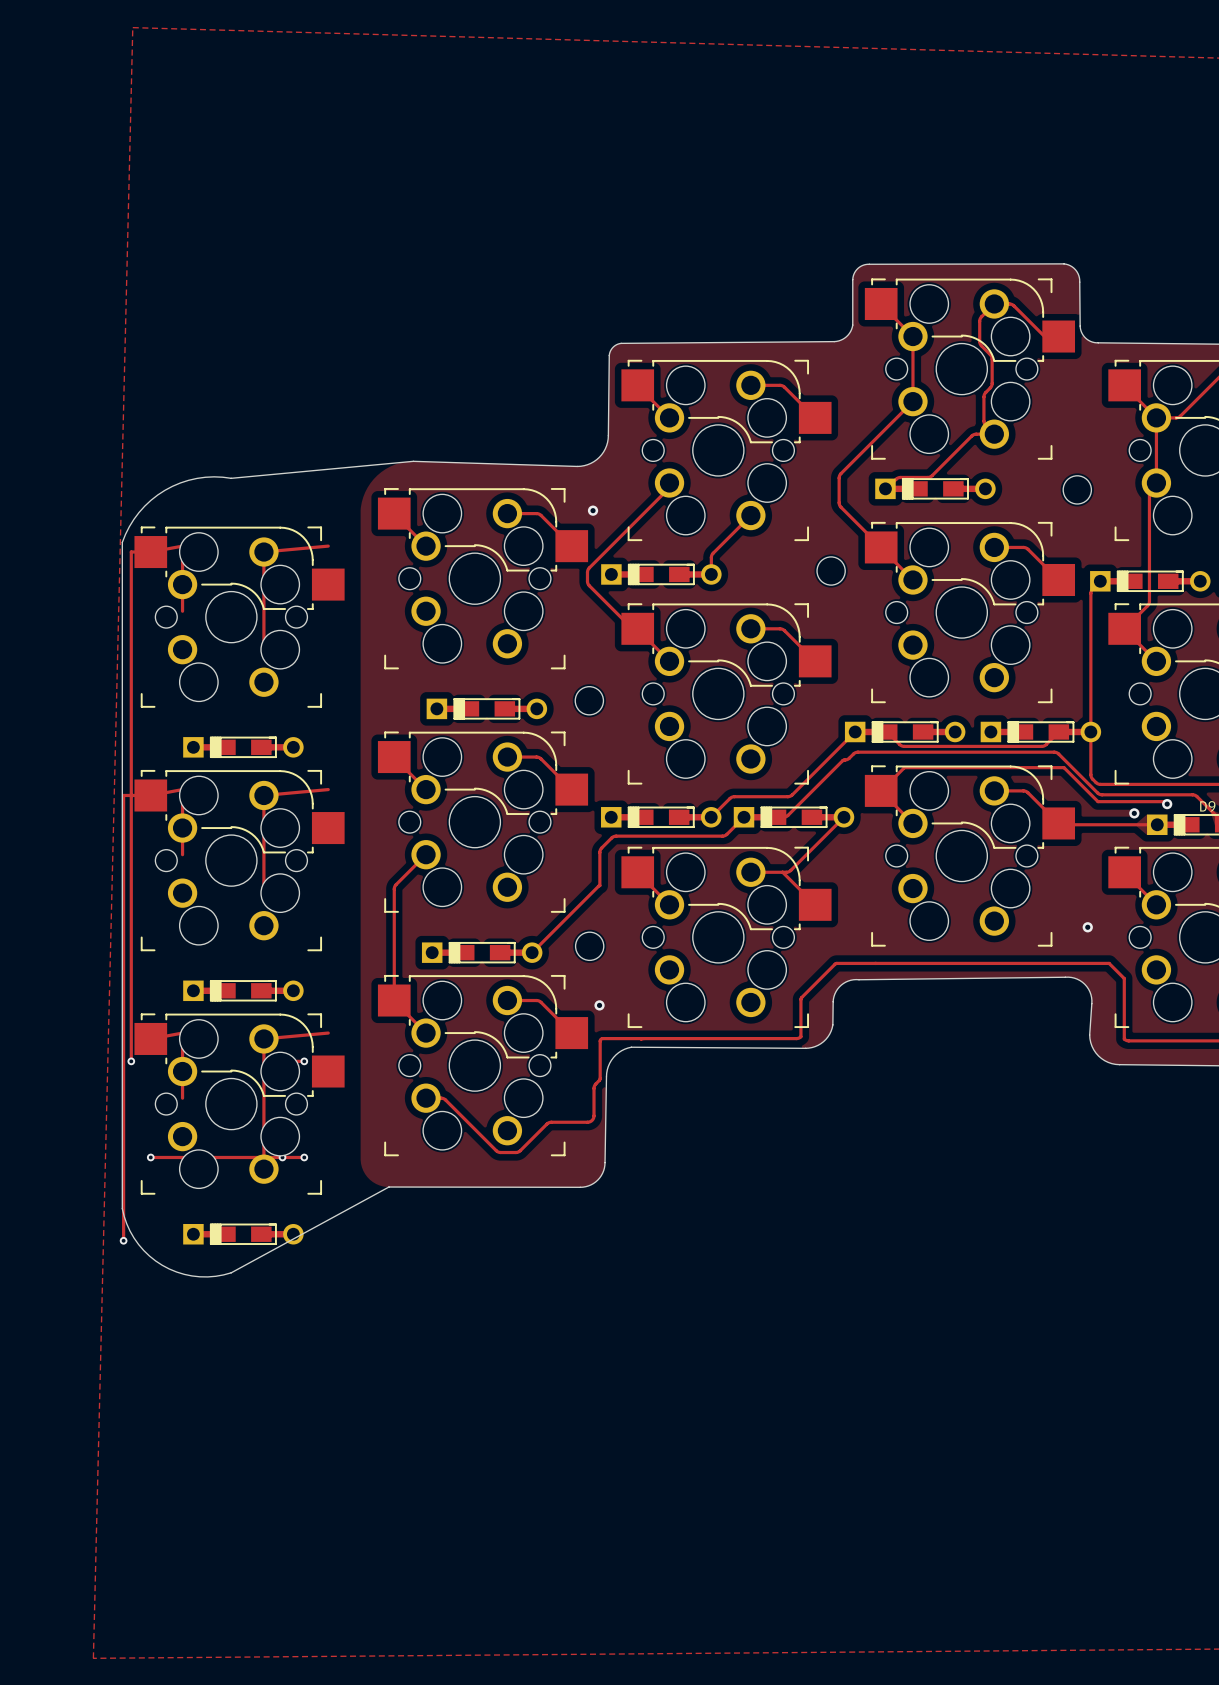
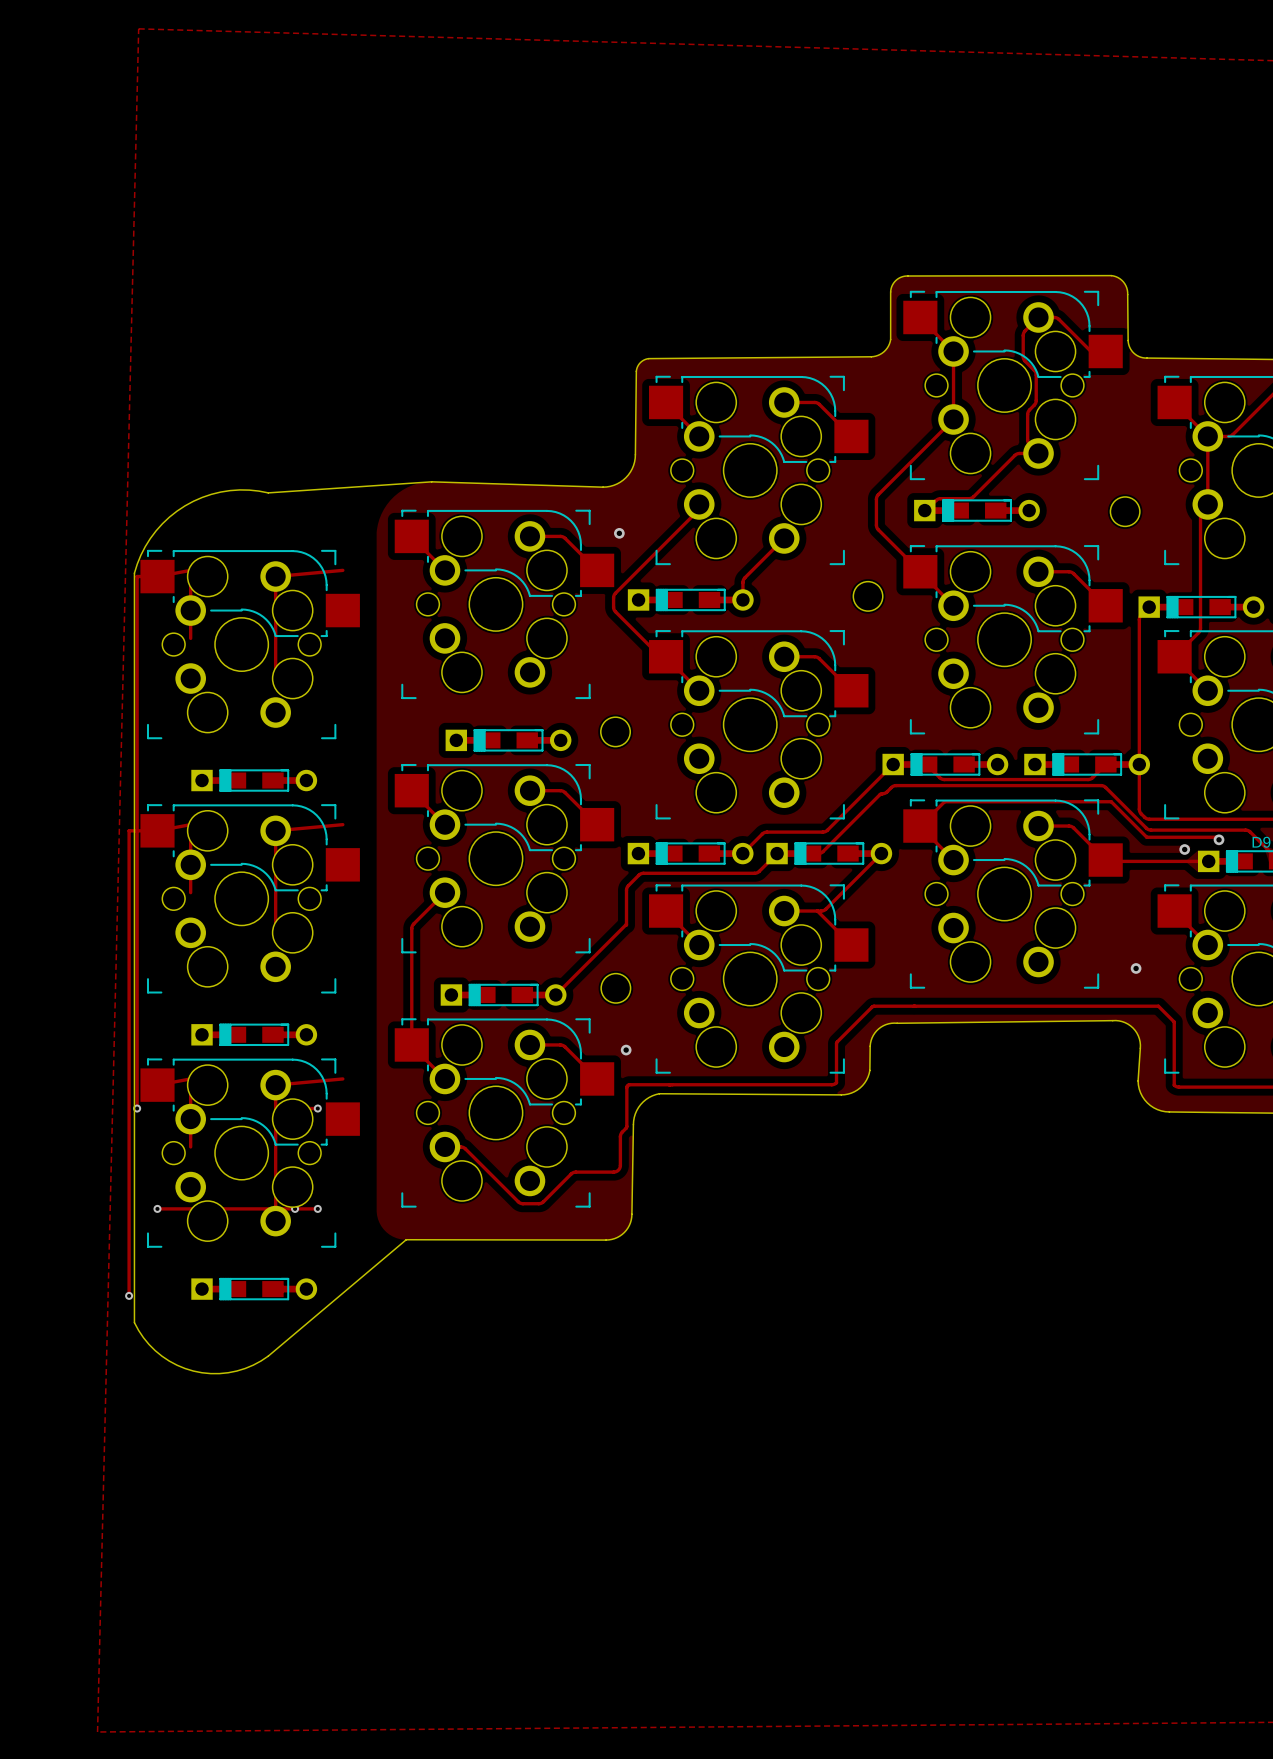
board edge: (413, 461) (231, 478) (205, 477) (188, 480) (164, 490) (151, 500) (133, 519) (122, 542) (122, 1208) (126, 1223) (143, 1250) (162, 1265) (184, 1274) (215, 1276) (231, 1272) (388, 1187) -> (431, 481) (268, 492) (239, 489) (211, 494) (185, 505) (162, 523) (145, 546) (134, 573) (134, 1322) (143, 1337) (155, 1350) (176, 1365) (193, 1371) (210, 1373) (228, 1372) (245, 1368) (268, 1356) (406, 1239)

